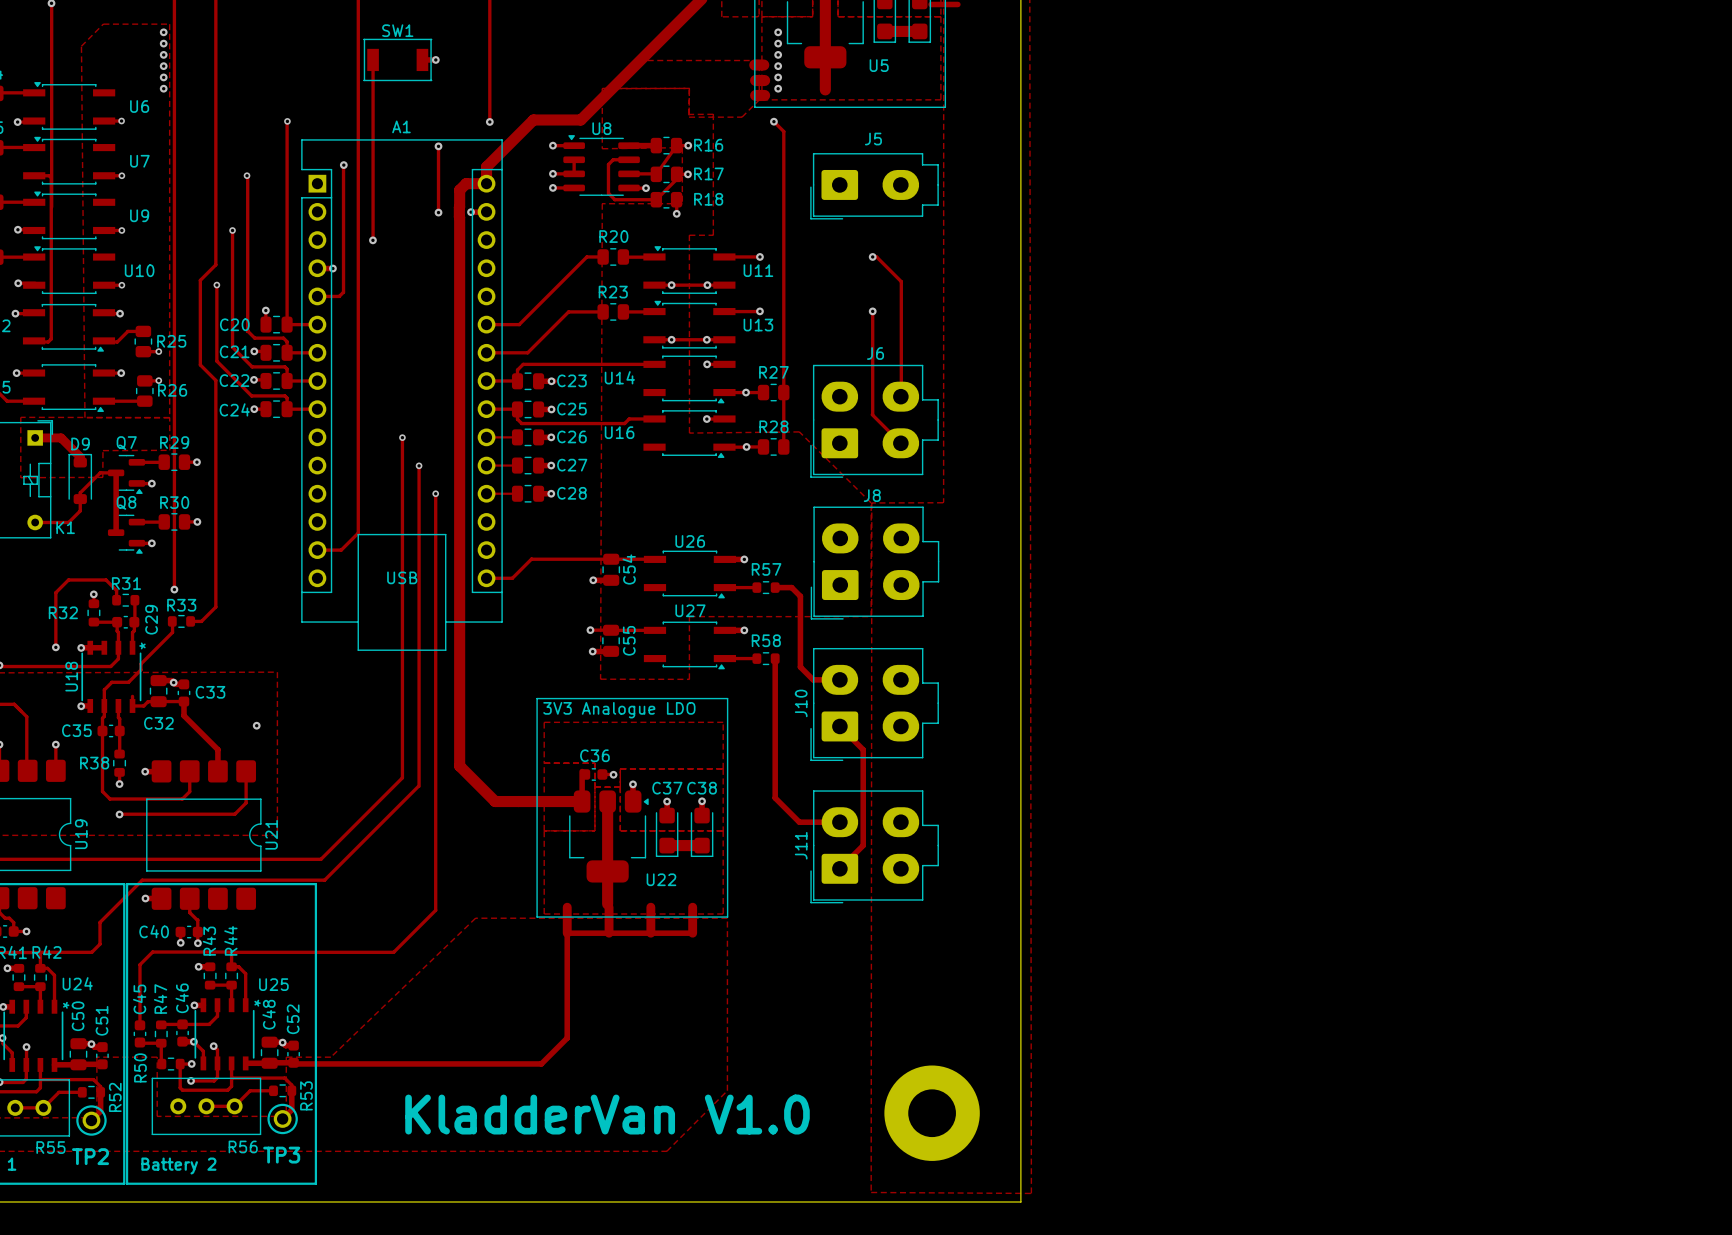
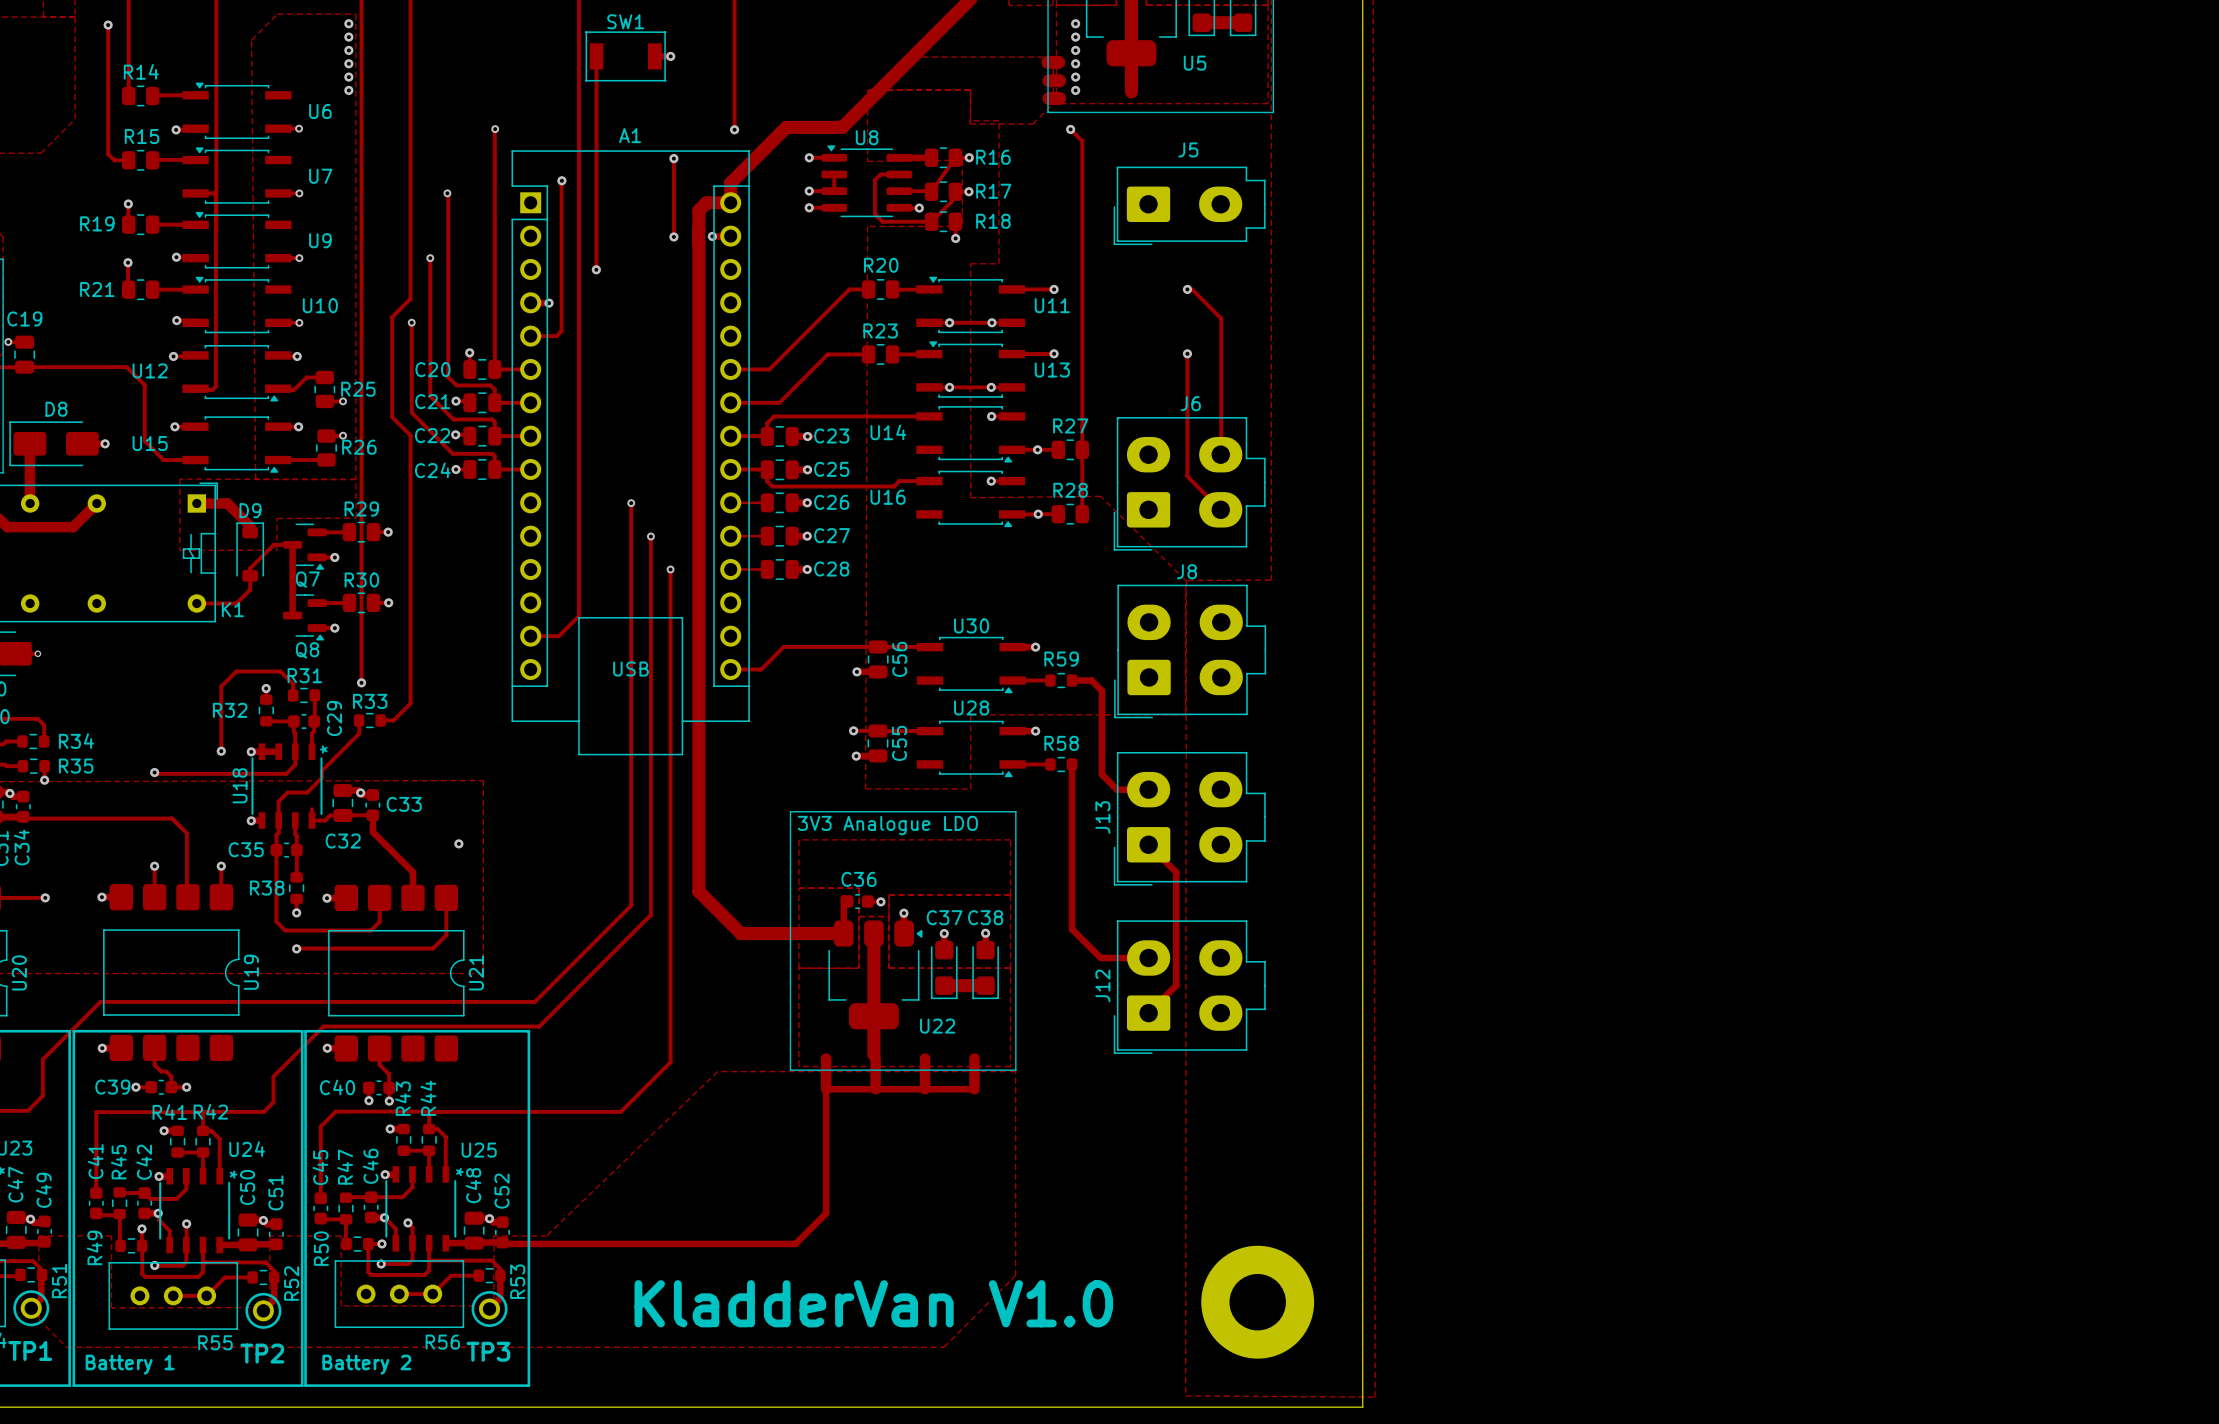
Q7 name position: Q7 (126, 443) -> Q7 (307, 579)
Q8 name position: Q8 (126, 502) -> Q8 (307, 650)
U26 name: U26 (690, 541) -> U30 (971, 625)
C54 name: C54 (629, 569) -> C56 (899, 659)
R57 name: R57 (766, 569) -> R59 (1061, 659)
U27 name: U27 (690, 610) -> U28 (971, 707)
J10 name: J10 (801, 703) -> J13 (1102, 817)
J11 name: J11 (801, 845) -> J12 (1102, 985)

